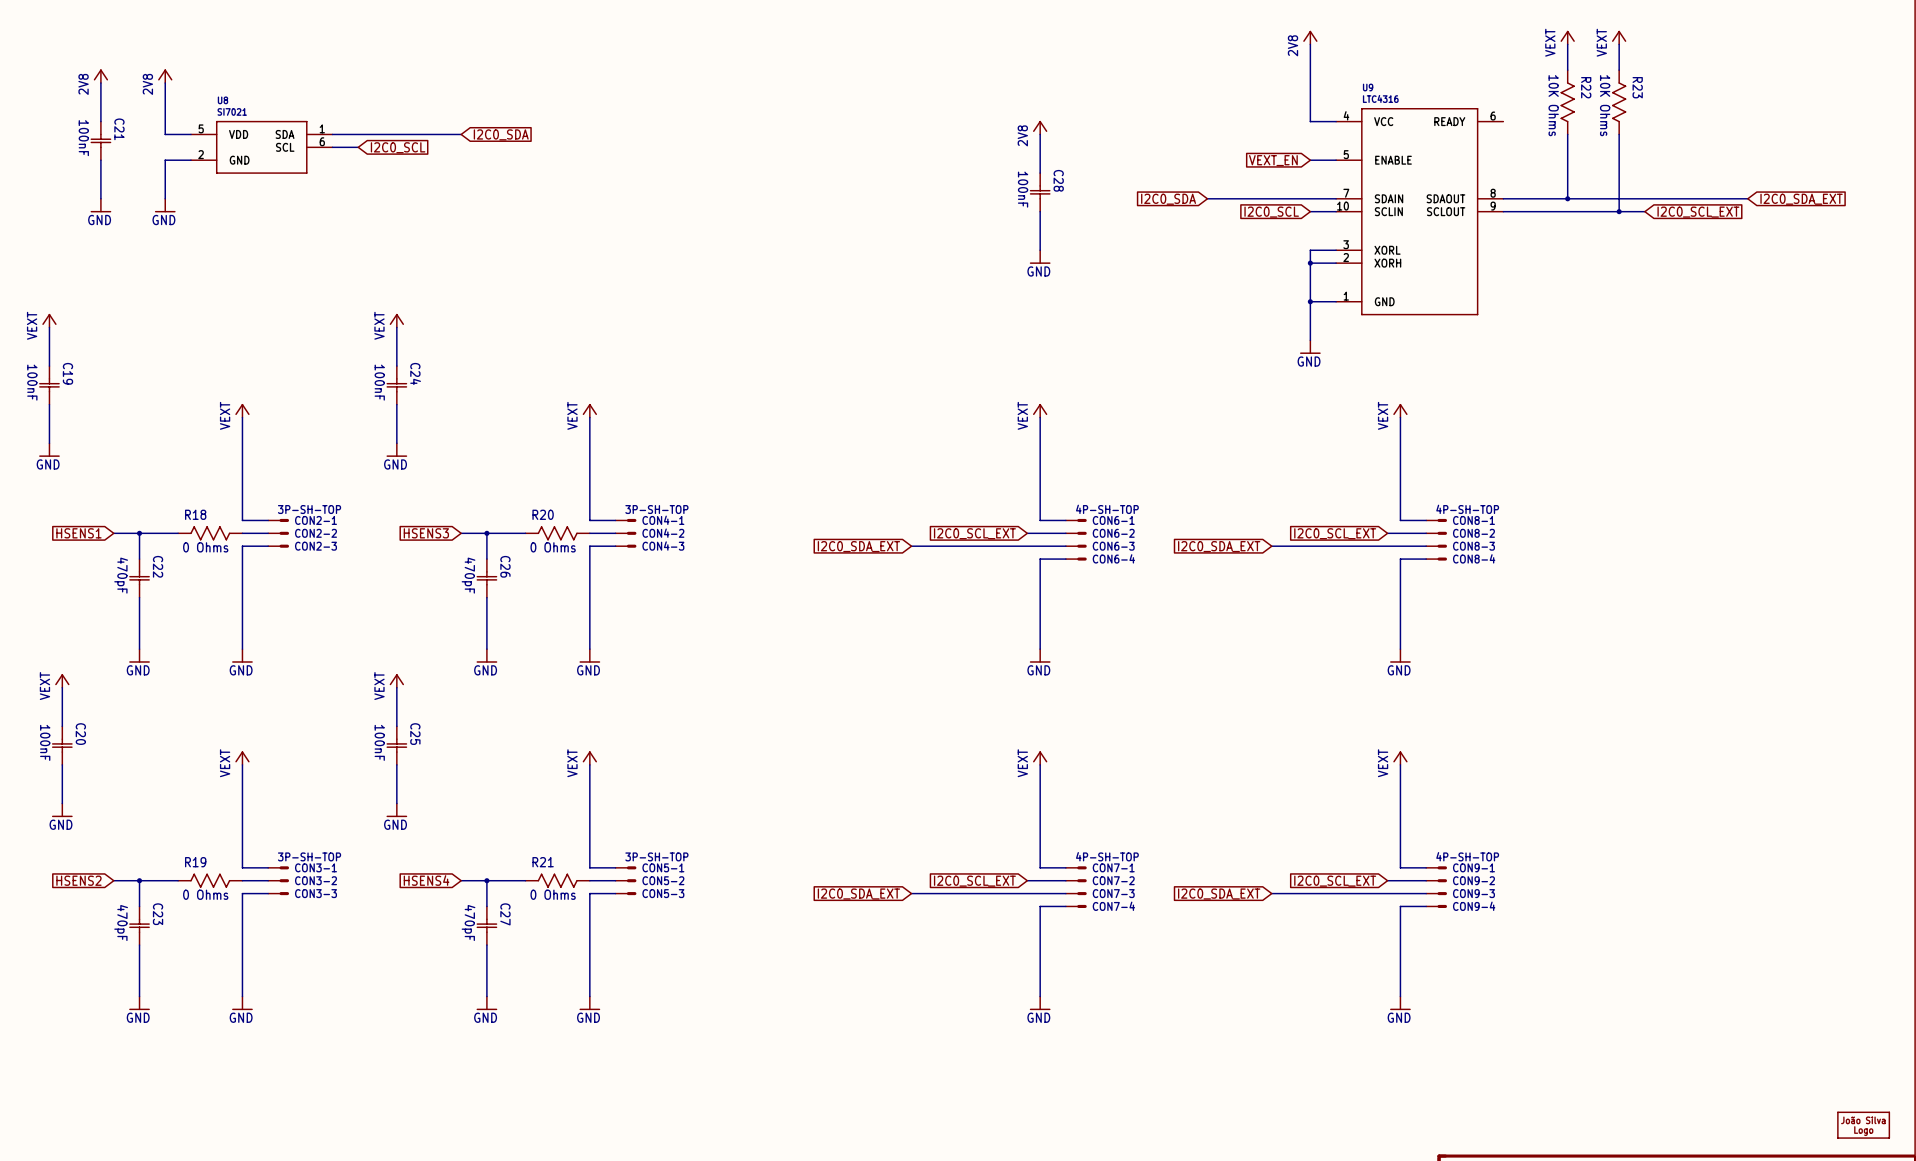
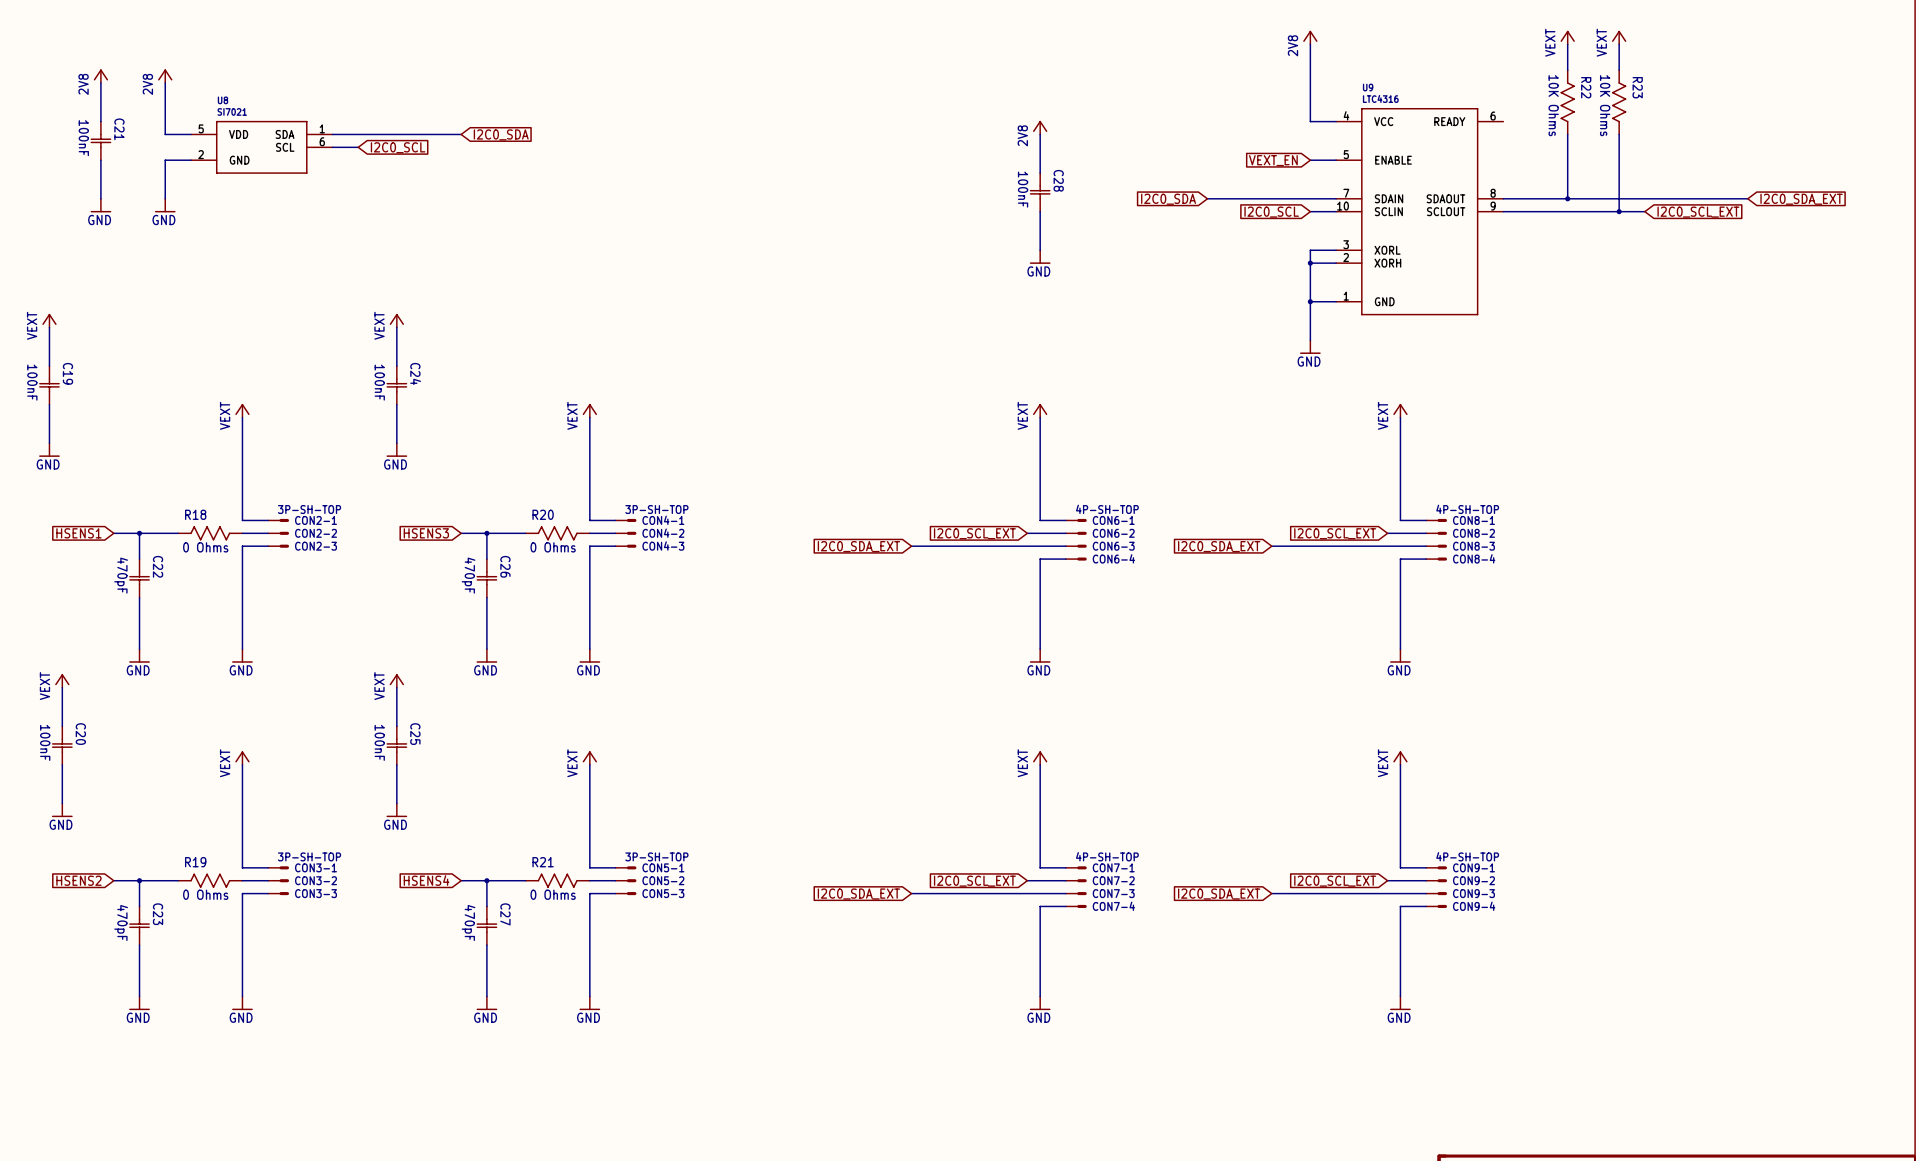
part: (1863, 1125) -> none

